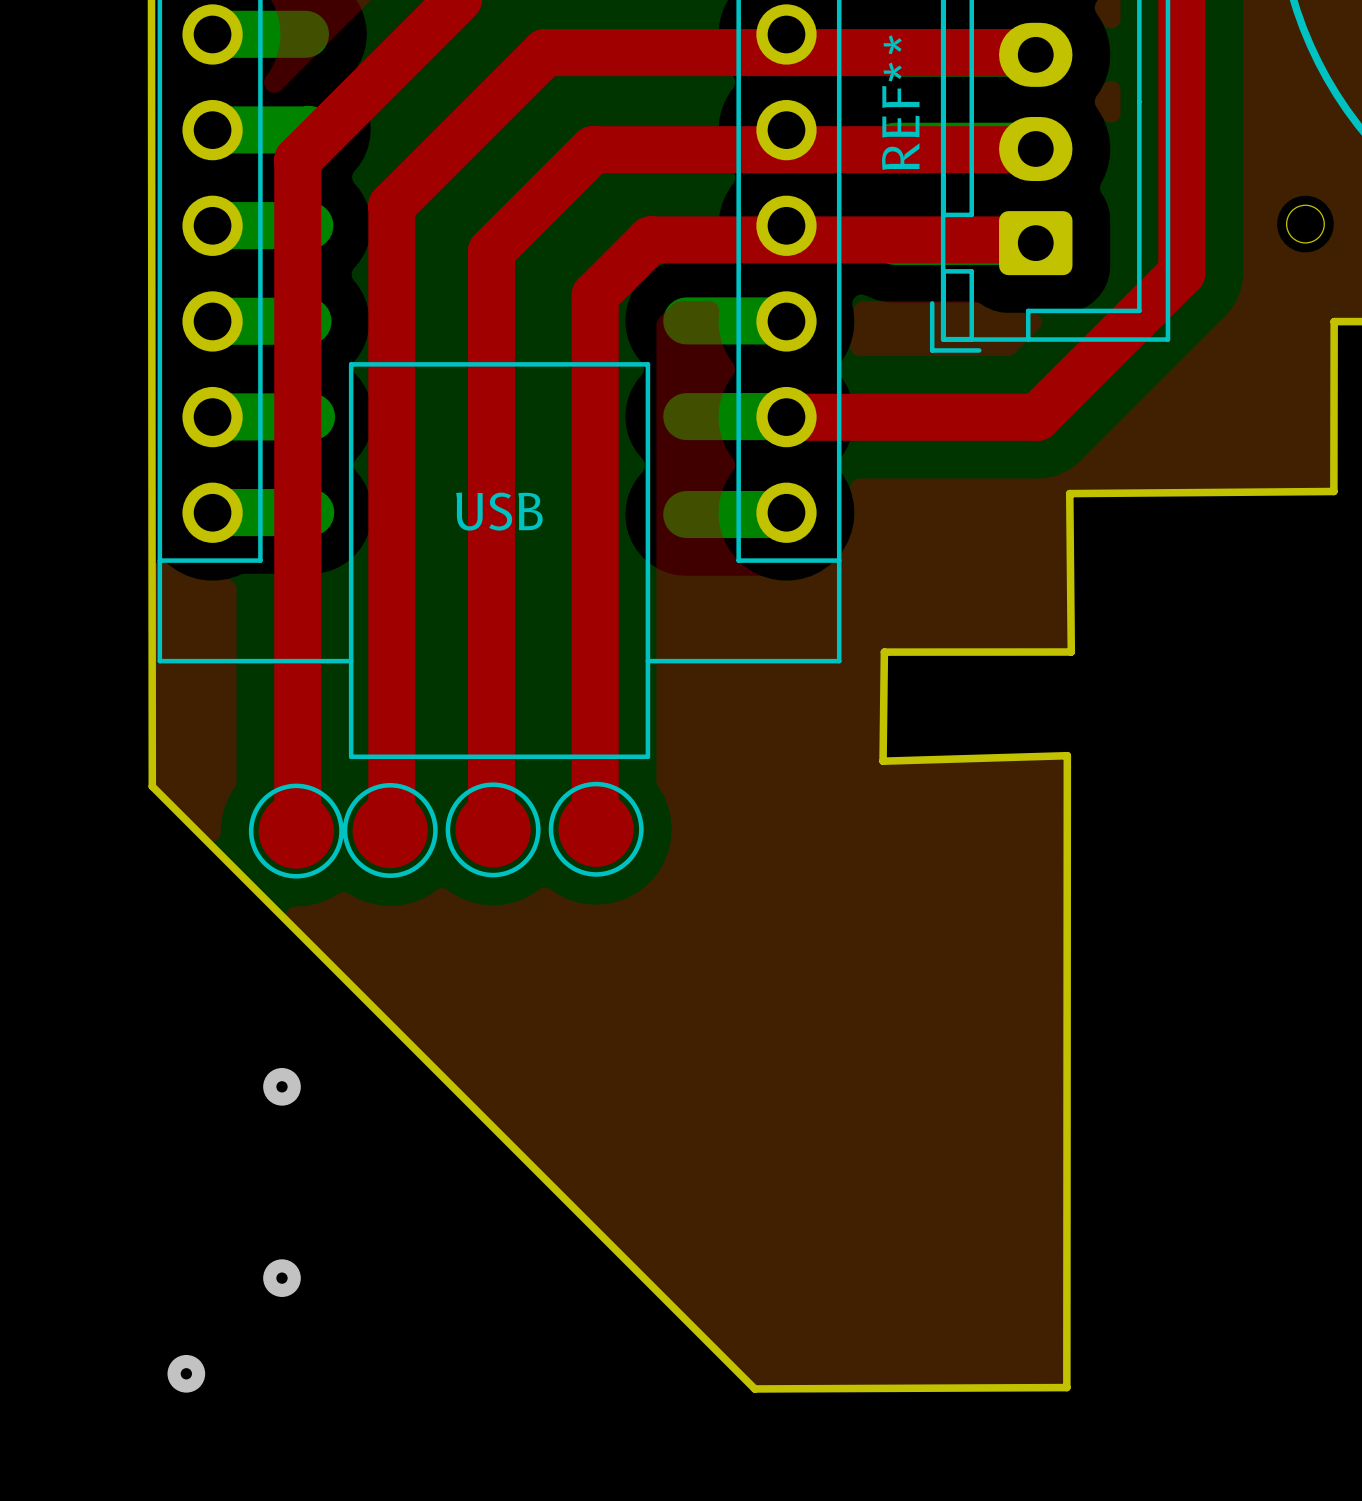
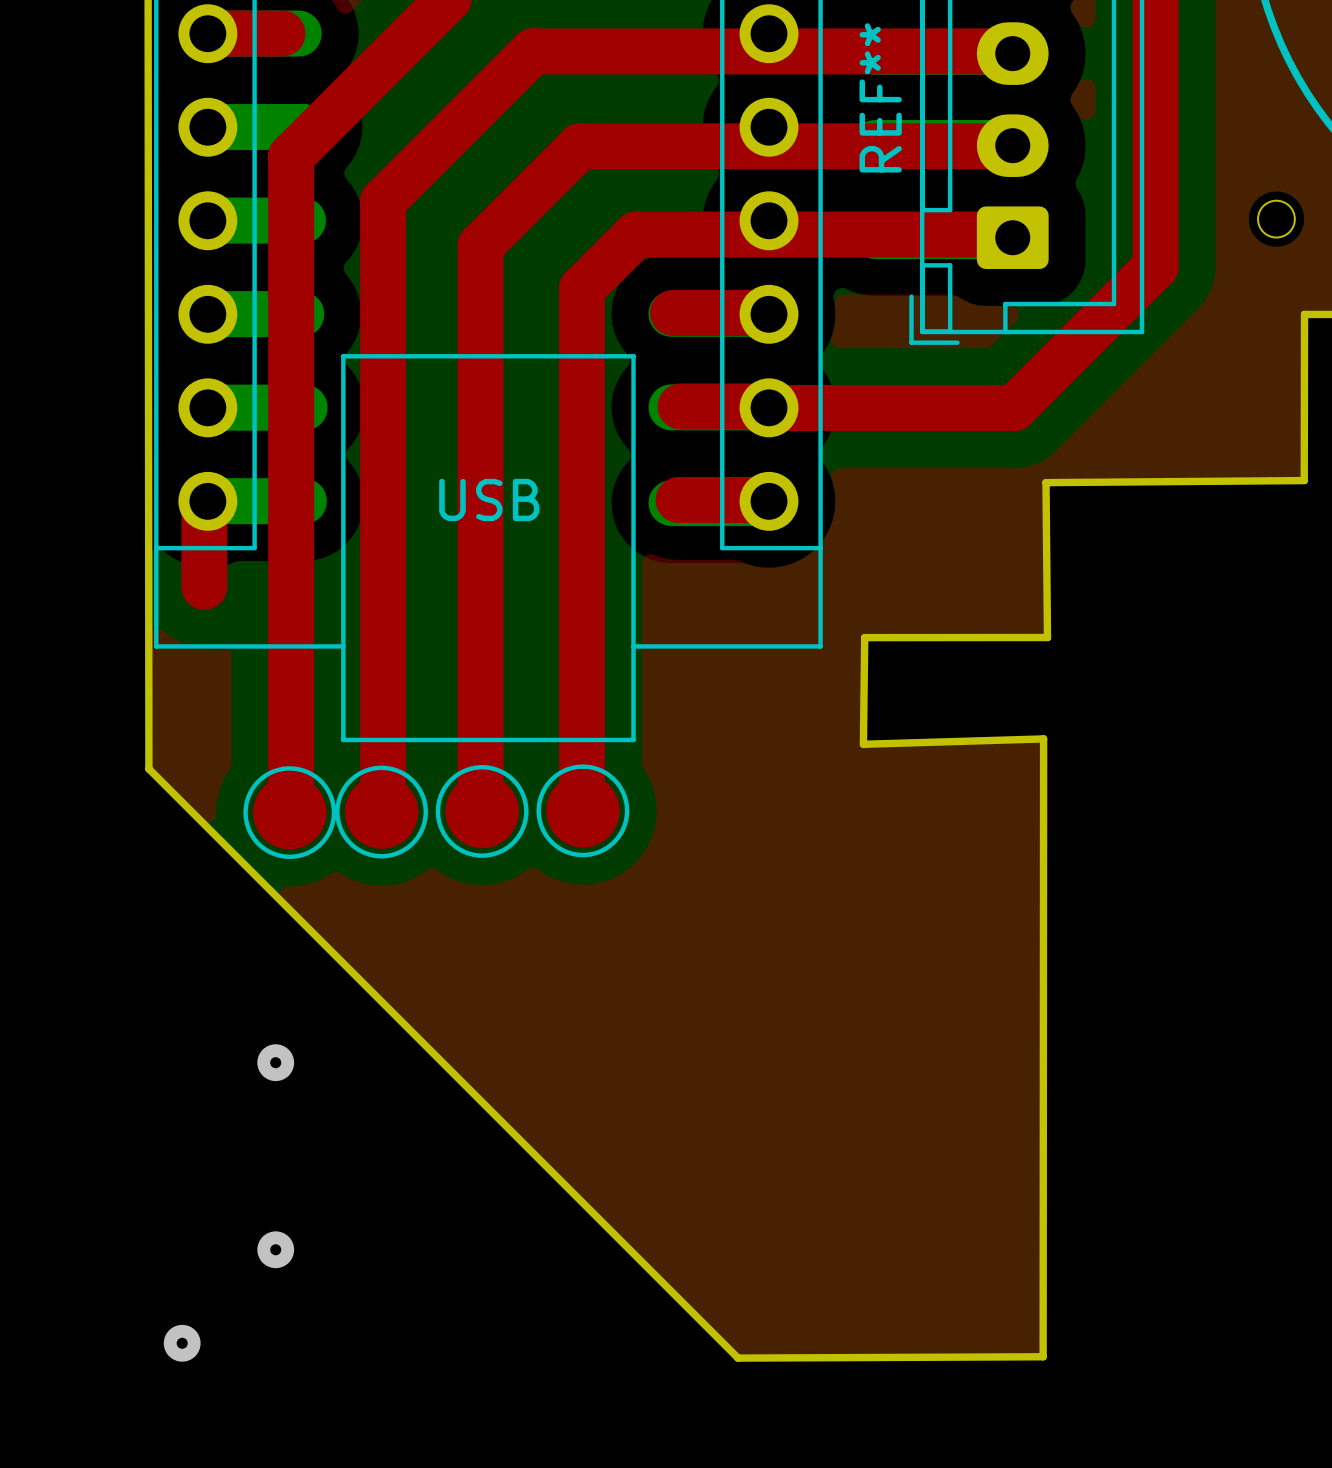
top track: none -> (204, 33) (282, 33)
top track: none -> (673, 312) (766, 312)
top track: none -> (680, 406) (766, 406)
top track: none -> (678, 499) (766, 499)
top track: none -> (204, 501) (204, 586)

